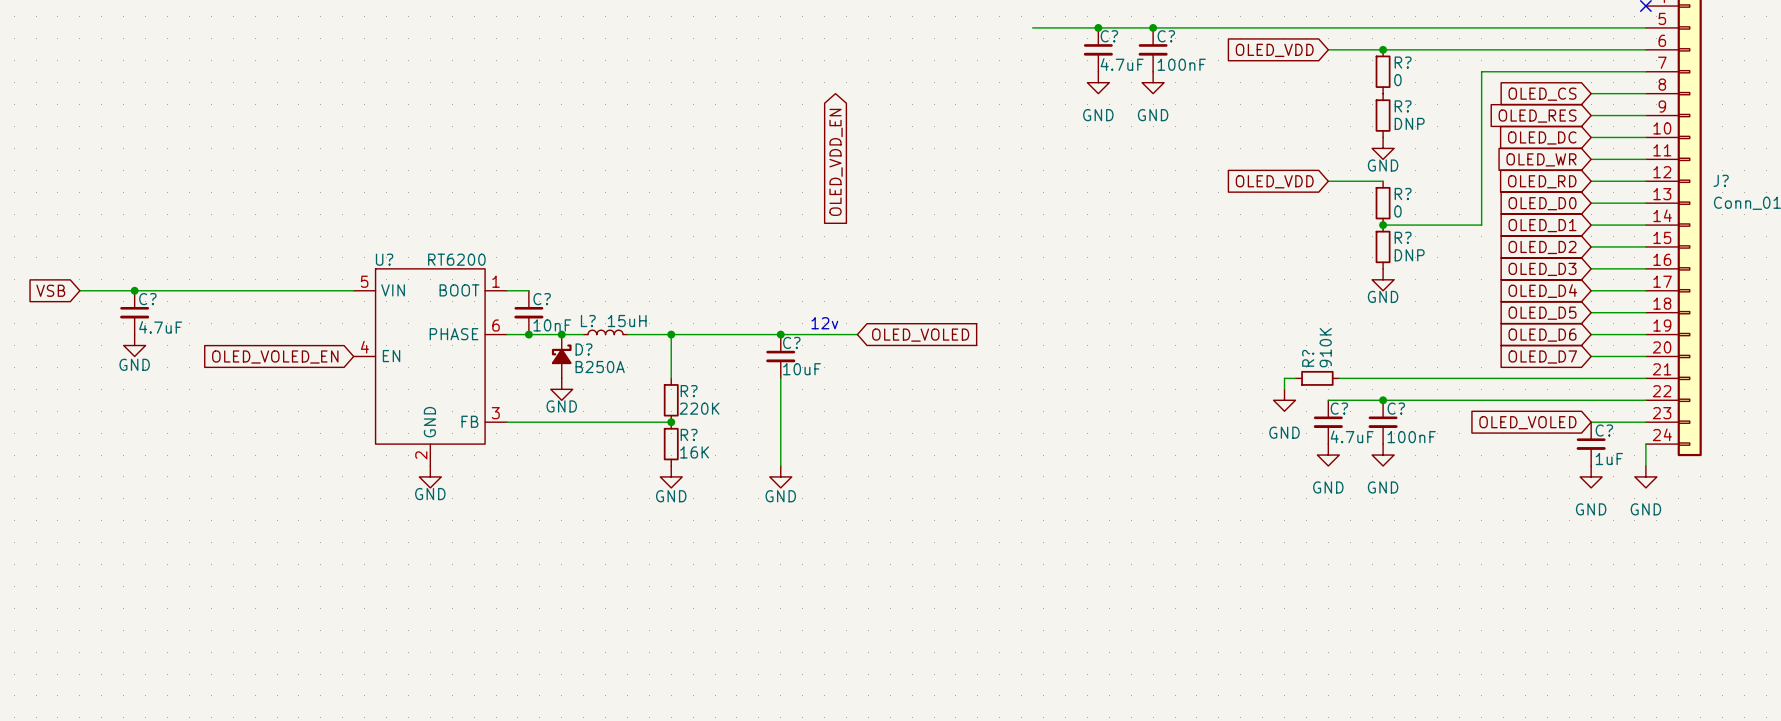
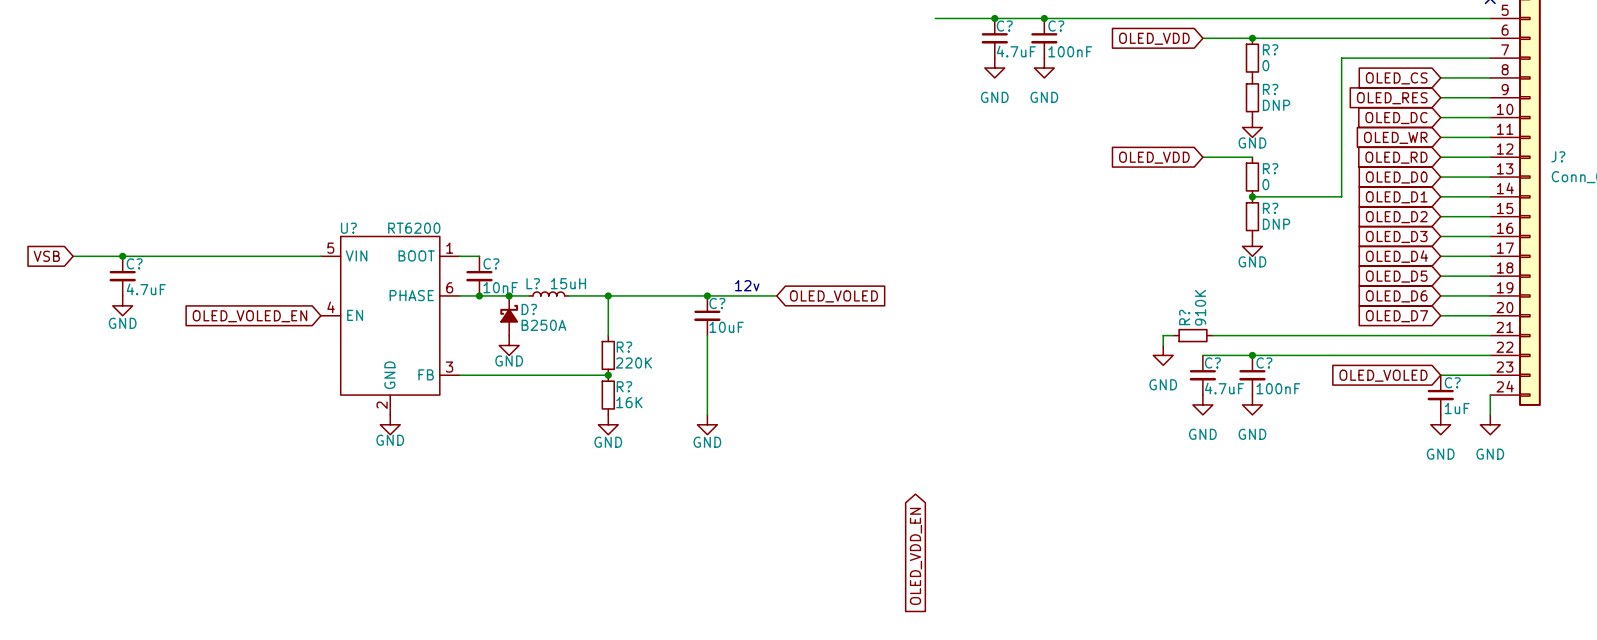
global label: OLED_VDD_EN (836, 162) -> none
global label: none -> OLED_VDD_EN (915, 556)

